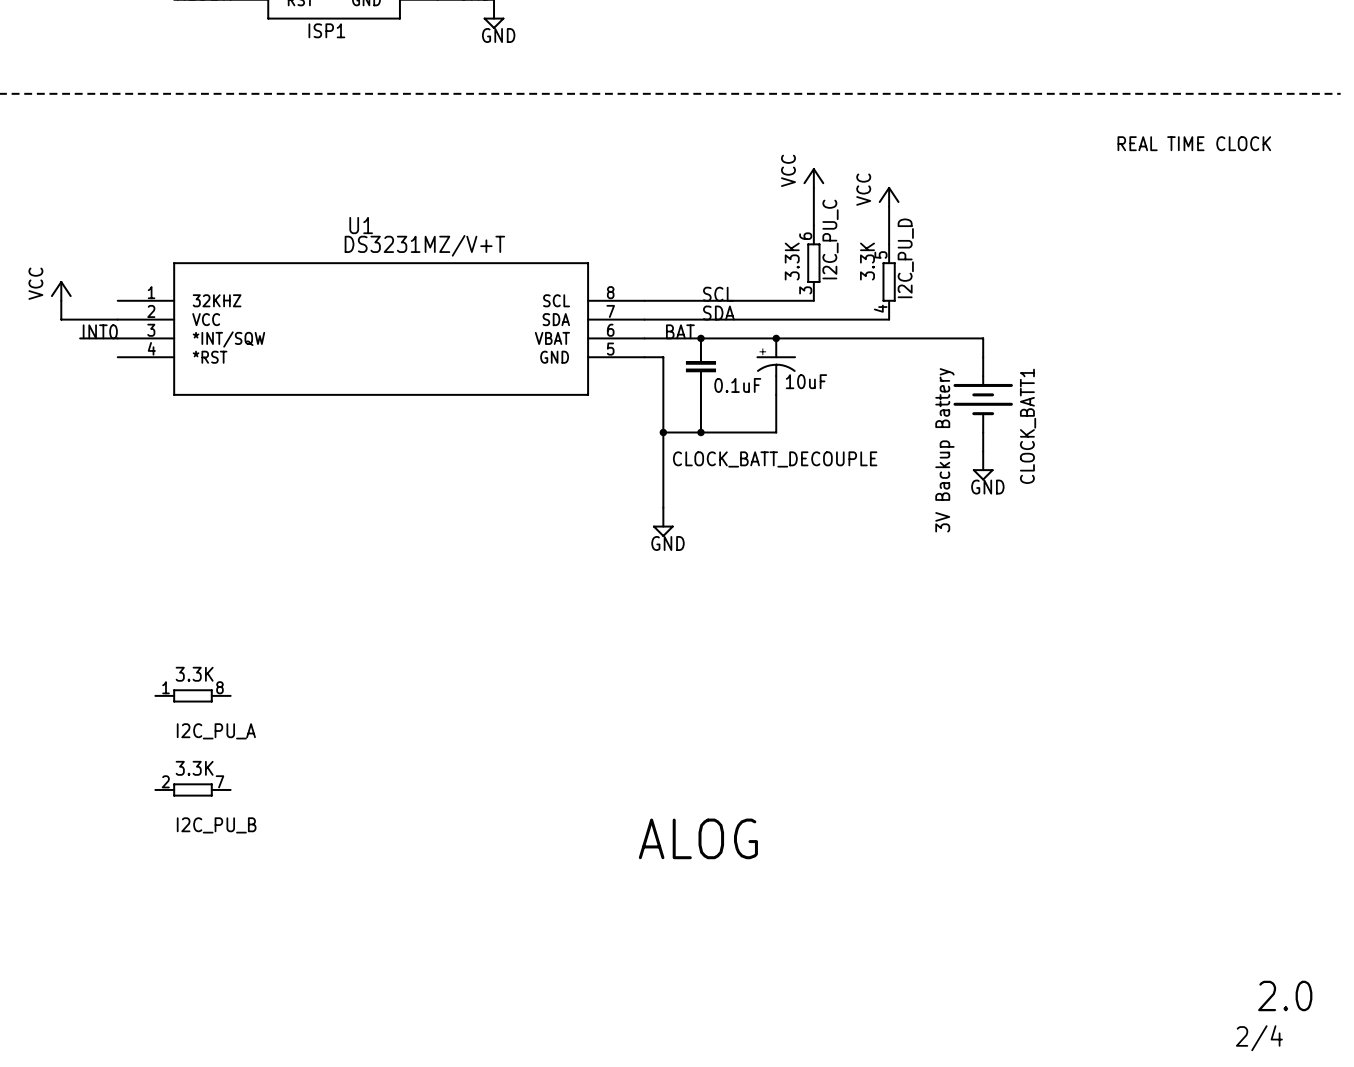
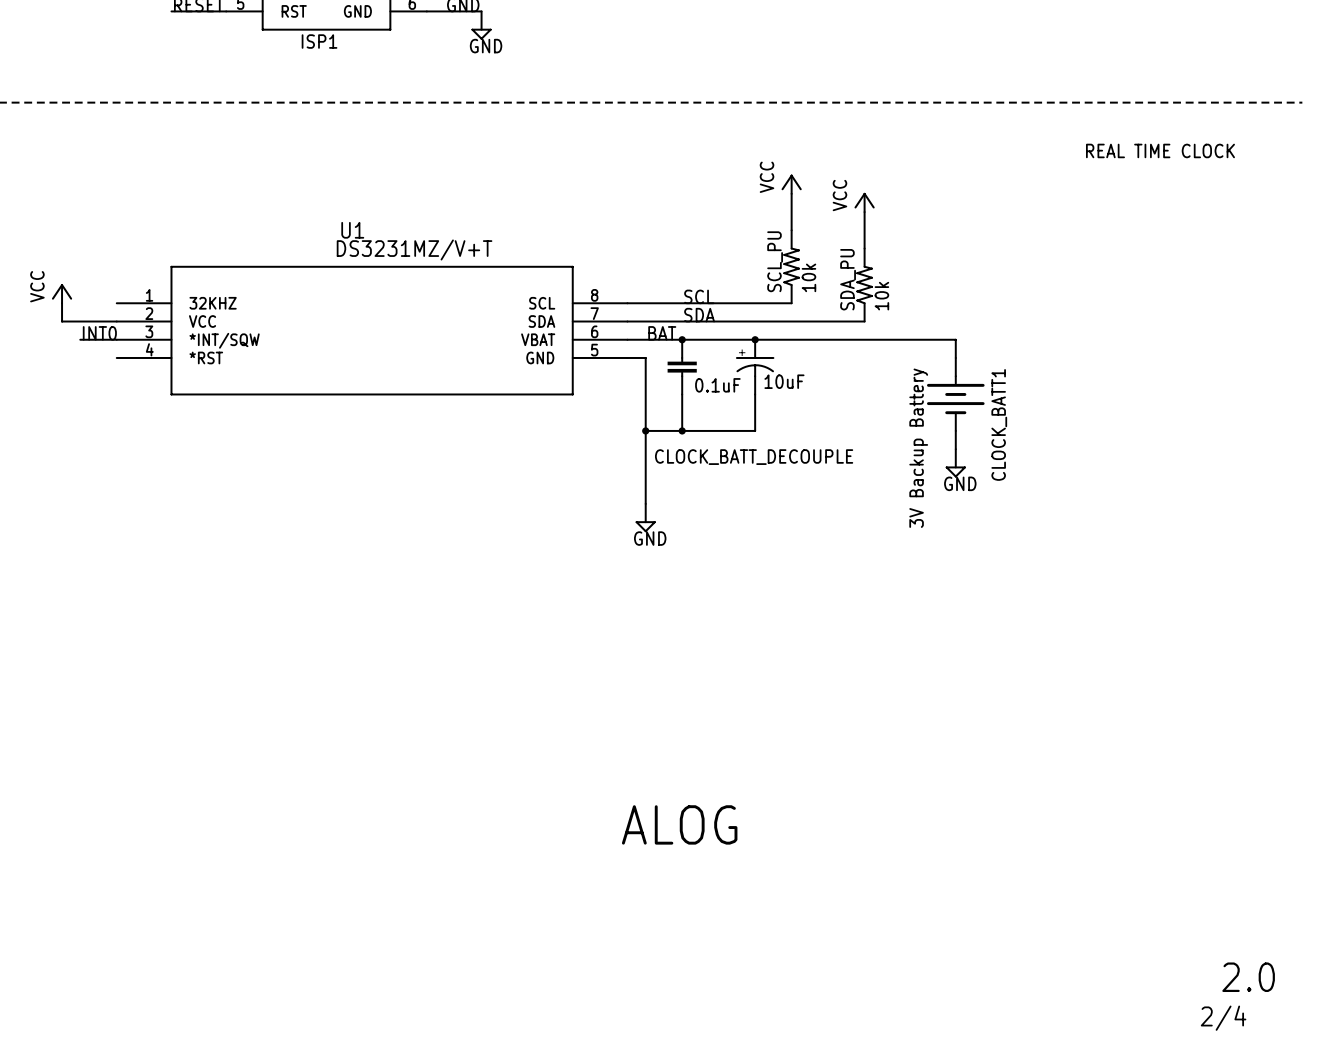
I2C_PU_C: 3.3K (813, 263) -> none
SCL_PU: none -> 10k (791, 266)
I2C_PU_D: 3.3K (889, 281) -> none
SDA_PU: none -> 10k (864, 285)
I2C_PU_A: 3.3K (192, 695) -> none
I2C_PU_B: 3.3K (192, 789) -> none

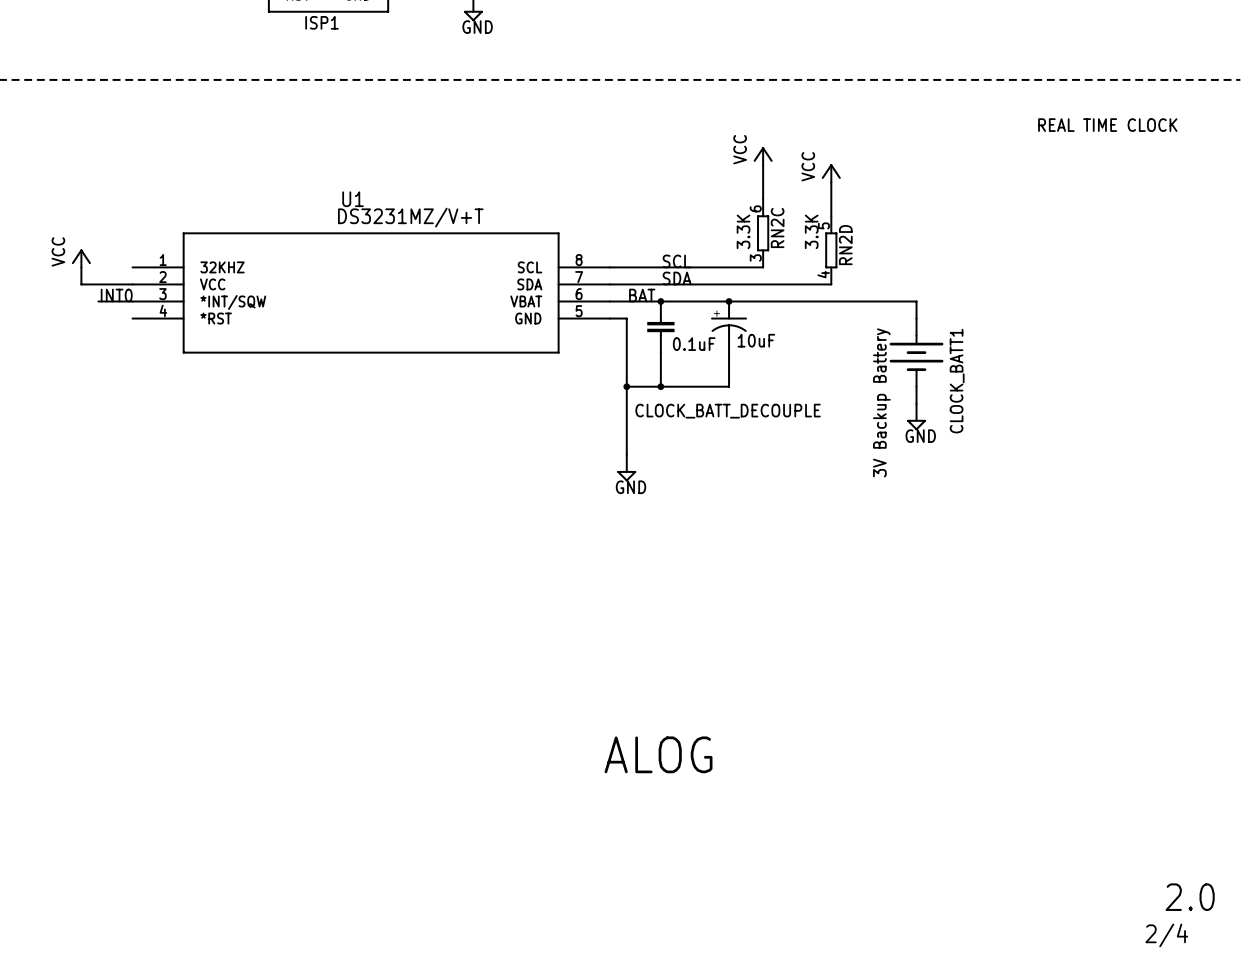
SCL_PU: 10k (791, 266) -> none
RN2C: none -> 3.3K (763, 233)
SDA_PU: 10k (864, 285) -> none
RN2D: none -> 3.3K (831, 250)

